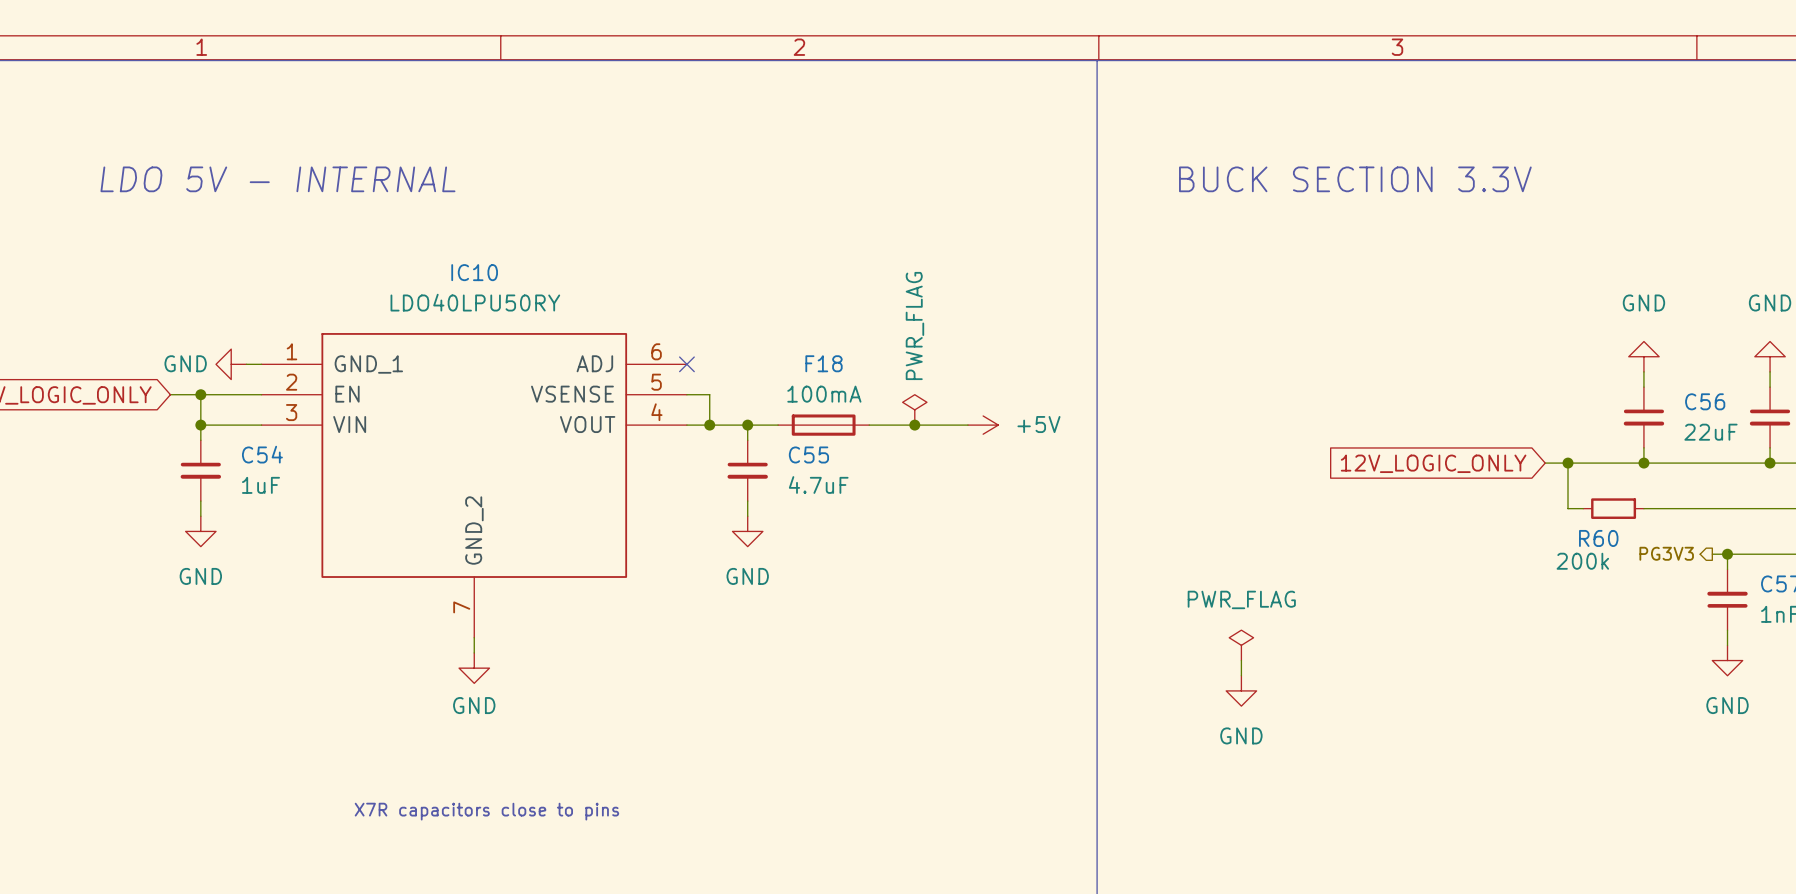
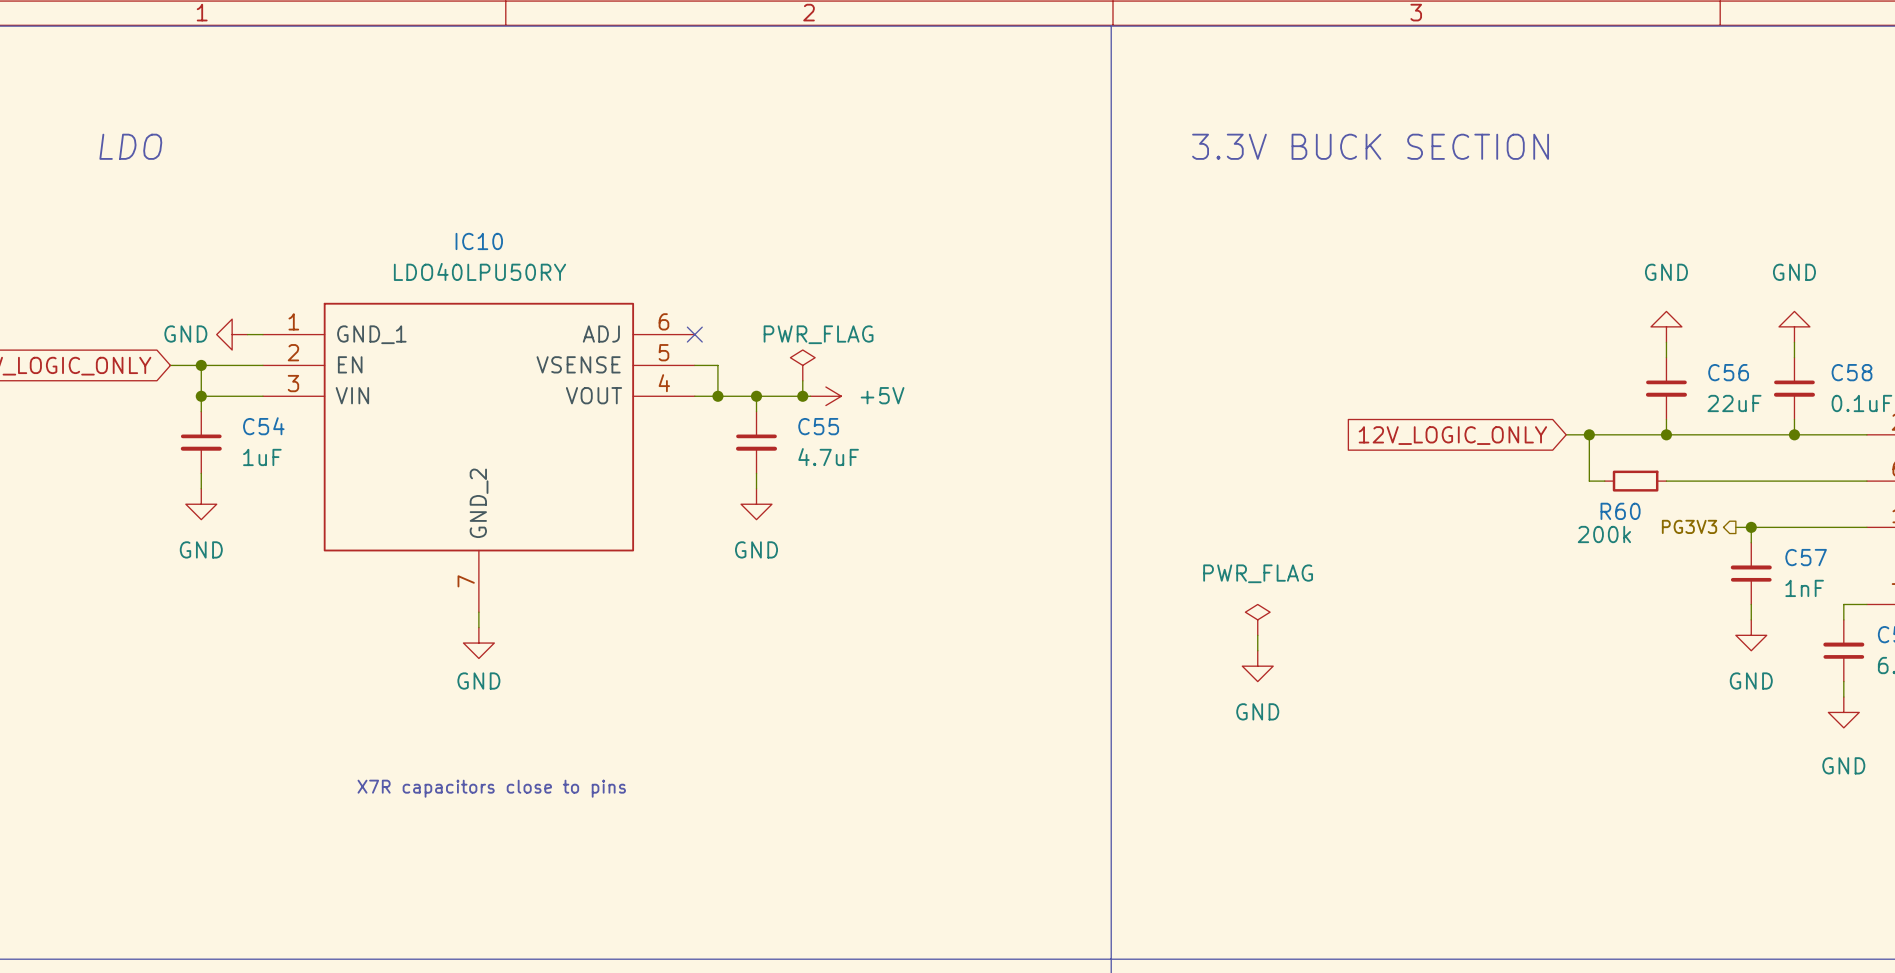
text: LDO 5V - INTERNAL (277, 179) -> LDO (130, 146)
text: BUCK SECTION 3.3V (1355, 179) -> 3.3V BUCK SECTION (1370, 146)
power symbol text rotation: 0° (914, 325) -> 90° clockwise (818, 334)
power symbol position: PWR_FLAG (914, 409) -> PWR_FLAG (802, 365)
junction: none -> (802, 396)
F18: 100mA (823, 425) -> none
wire: (869, 425) (967, 425) -> none
junction: (914, 425) -> none
power symbol position: +5V (983, 425) -> +5V (825, 396)

